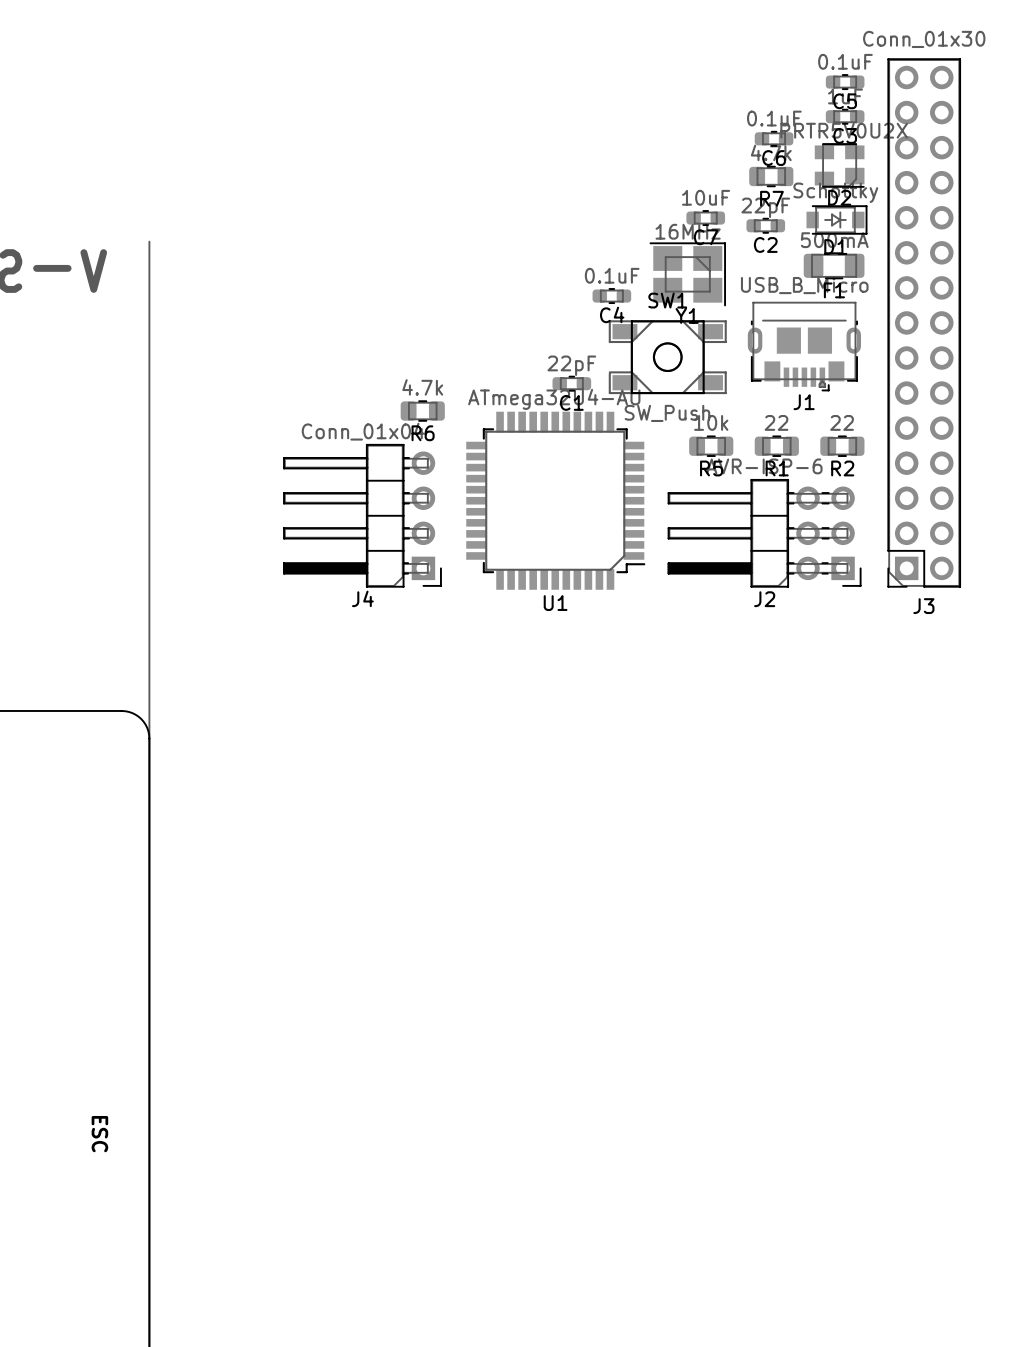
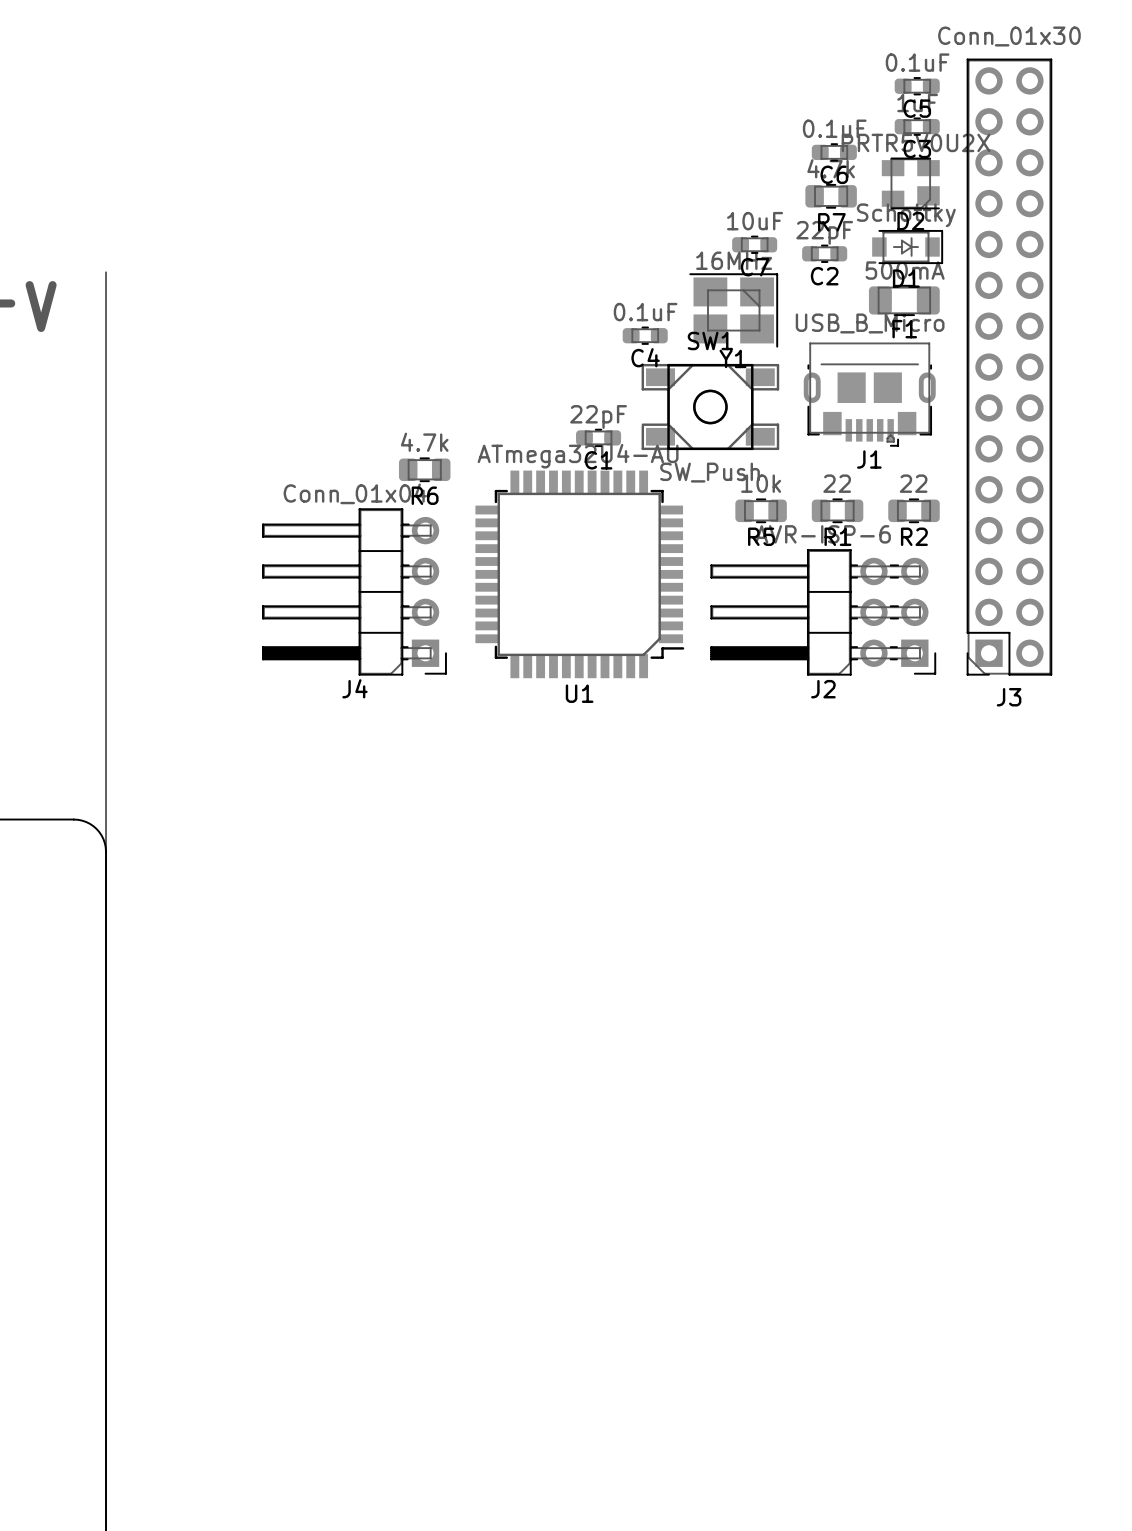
text: ESC (99, 1134) -> none

